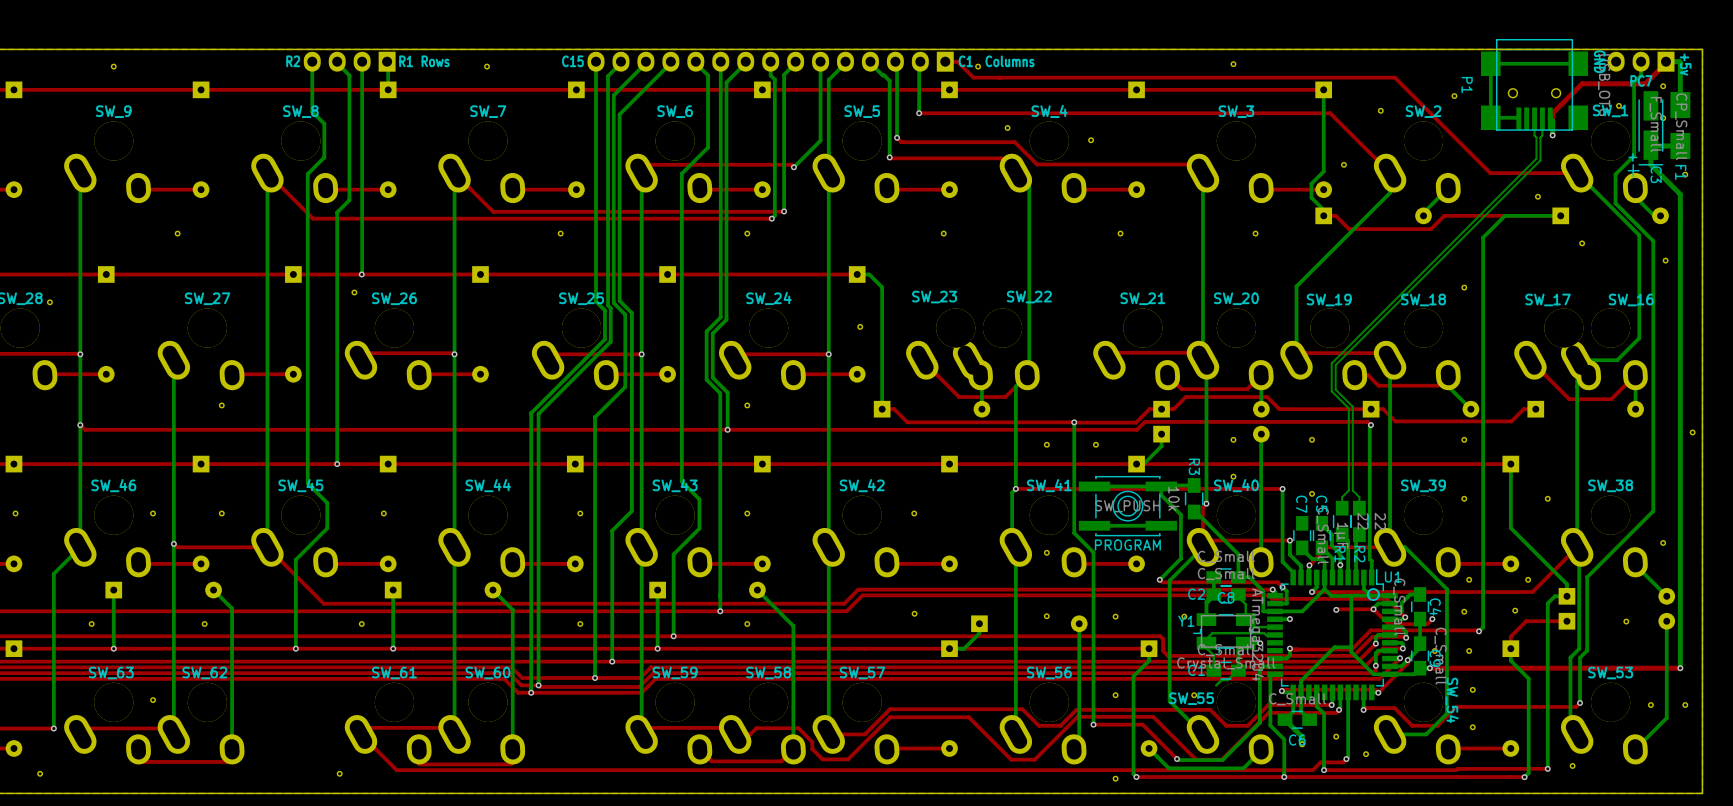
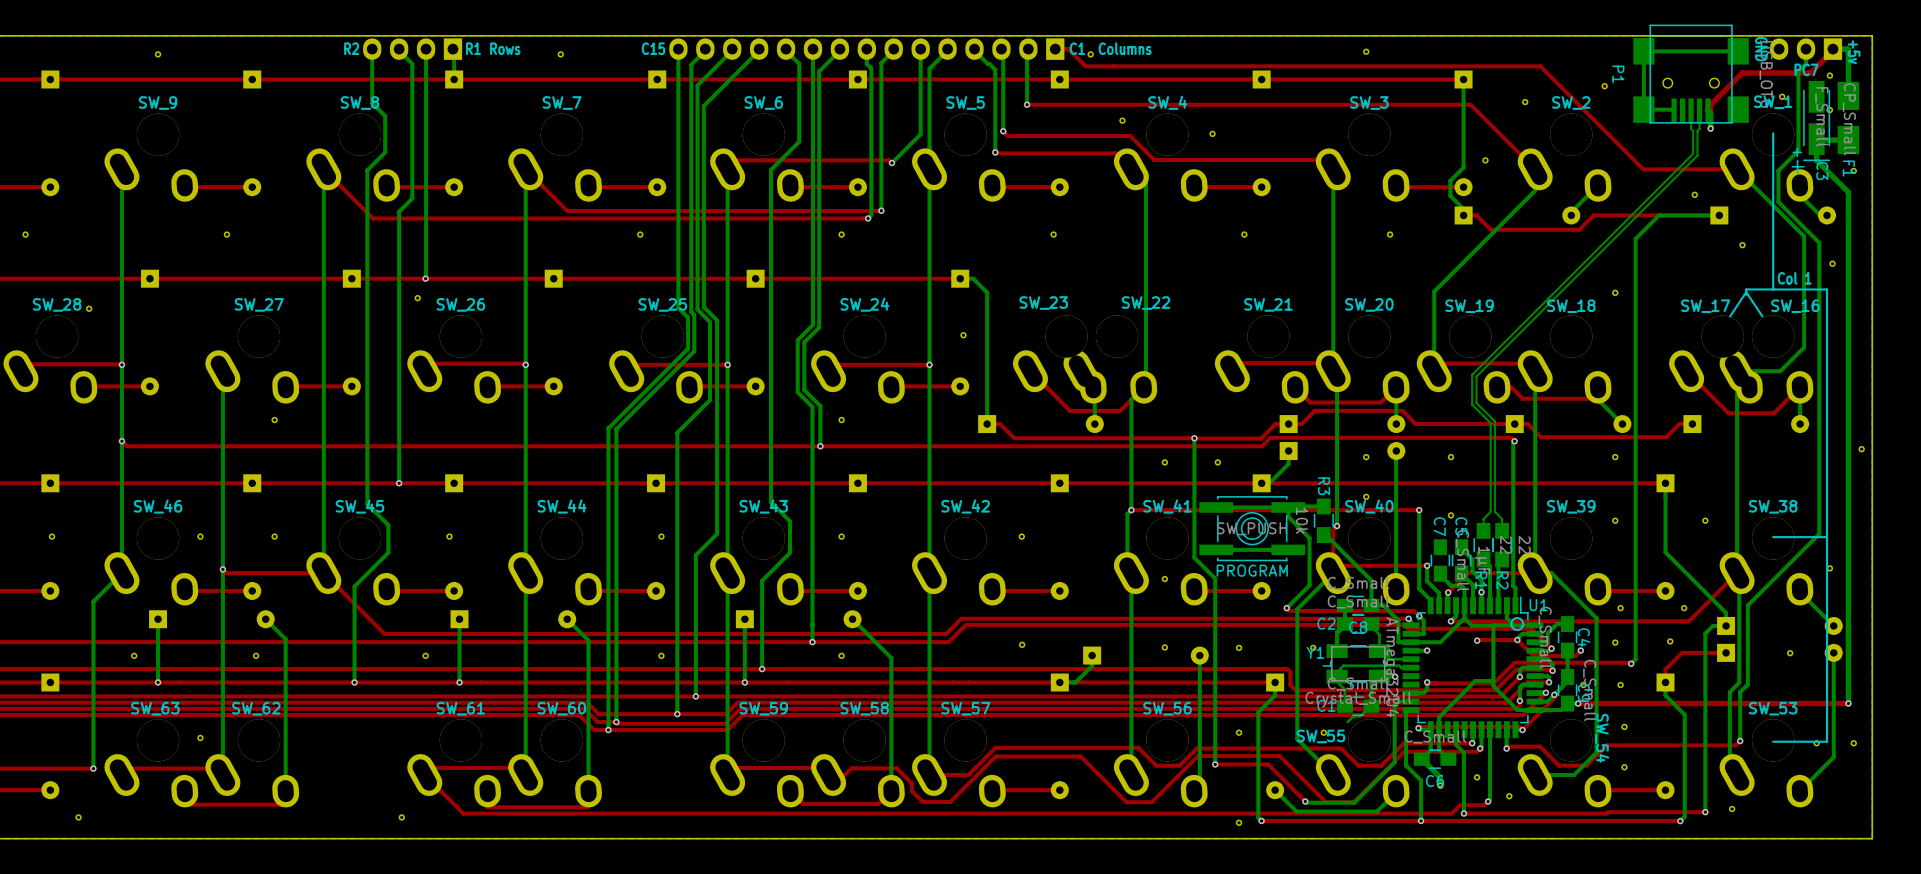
line: none -> (1773, 133) (1773, 289)
text: none -> Col 1 (1794, 278)
line: none -> (1746, 294) (1746, 289) (1827, 289) (1827, 741) (1773, 741)
line: none -> (1762, 316) (1746, 292) (1730, 316)
line: none -> (1827, 537) (1773, 537)

